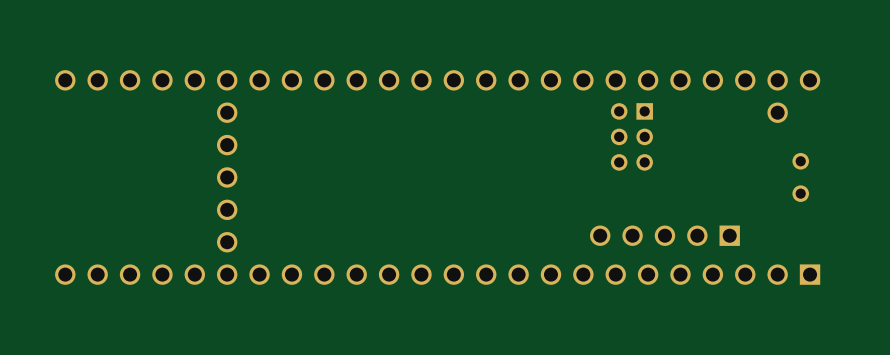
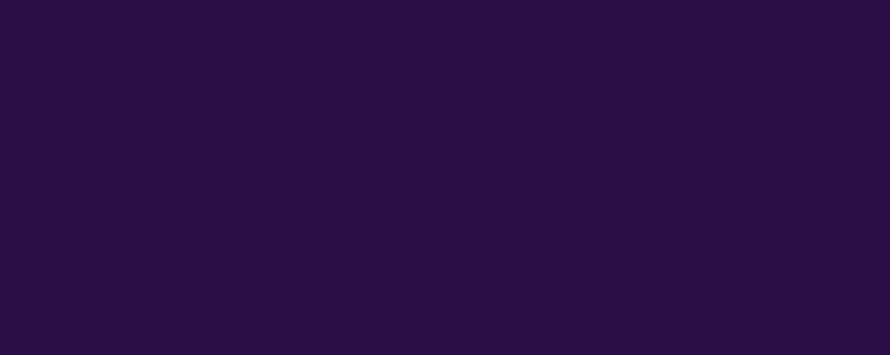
part: (437, 177) -> none

